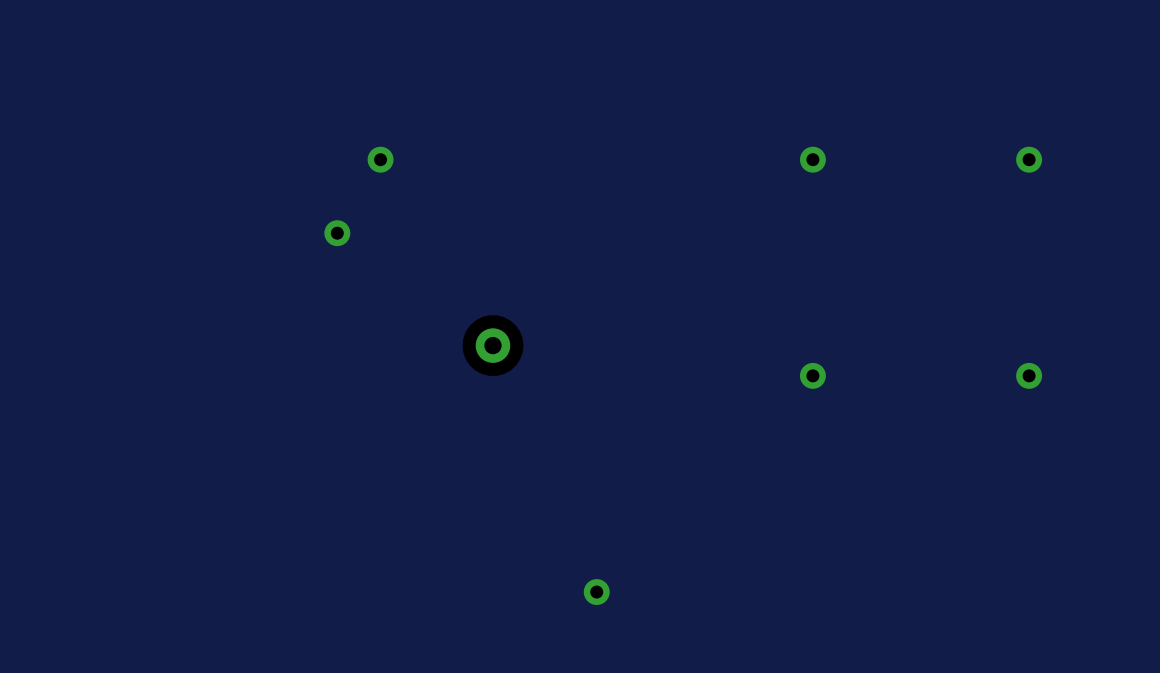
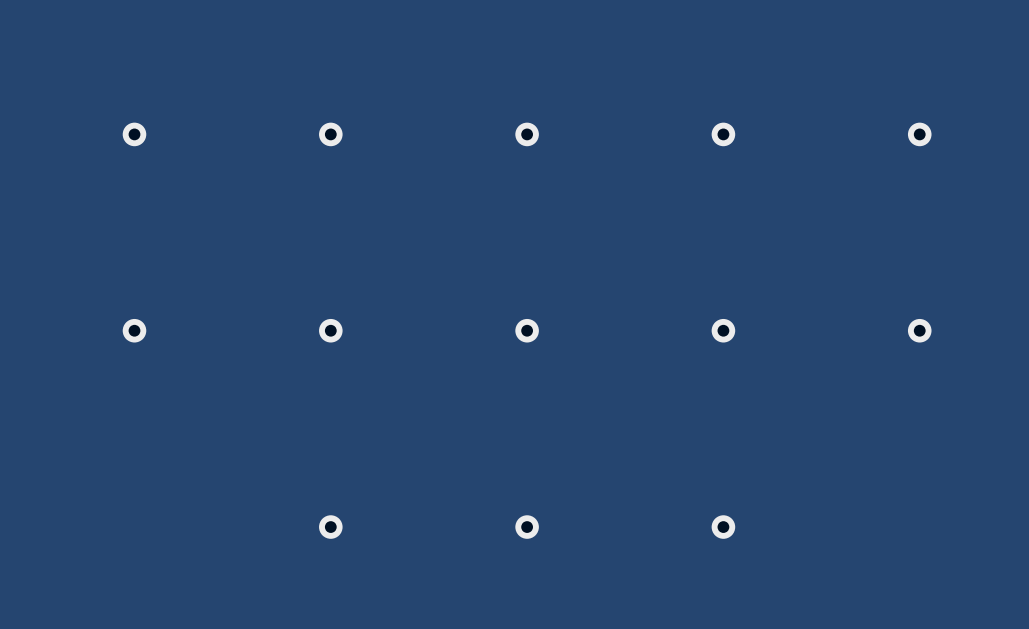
via: none -> (134, 134)
via: none -> (527, 134)
via: (337, 233) -> none
via: (492, 345) -> none
via: none -> (134, 330)
via: none -> (330, 330)
via: none -> (527, 330)
via: none -> (330, 527)
via: none -> (723, 527)

